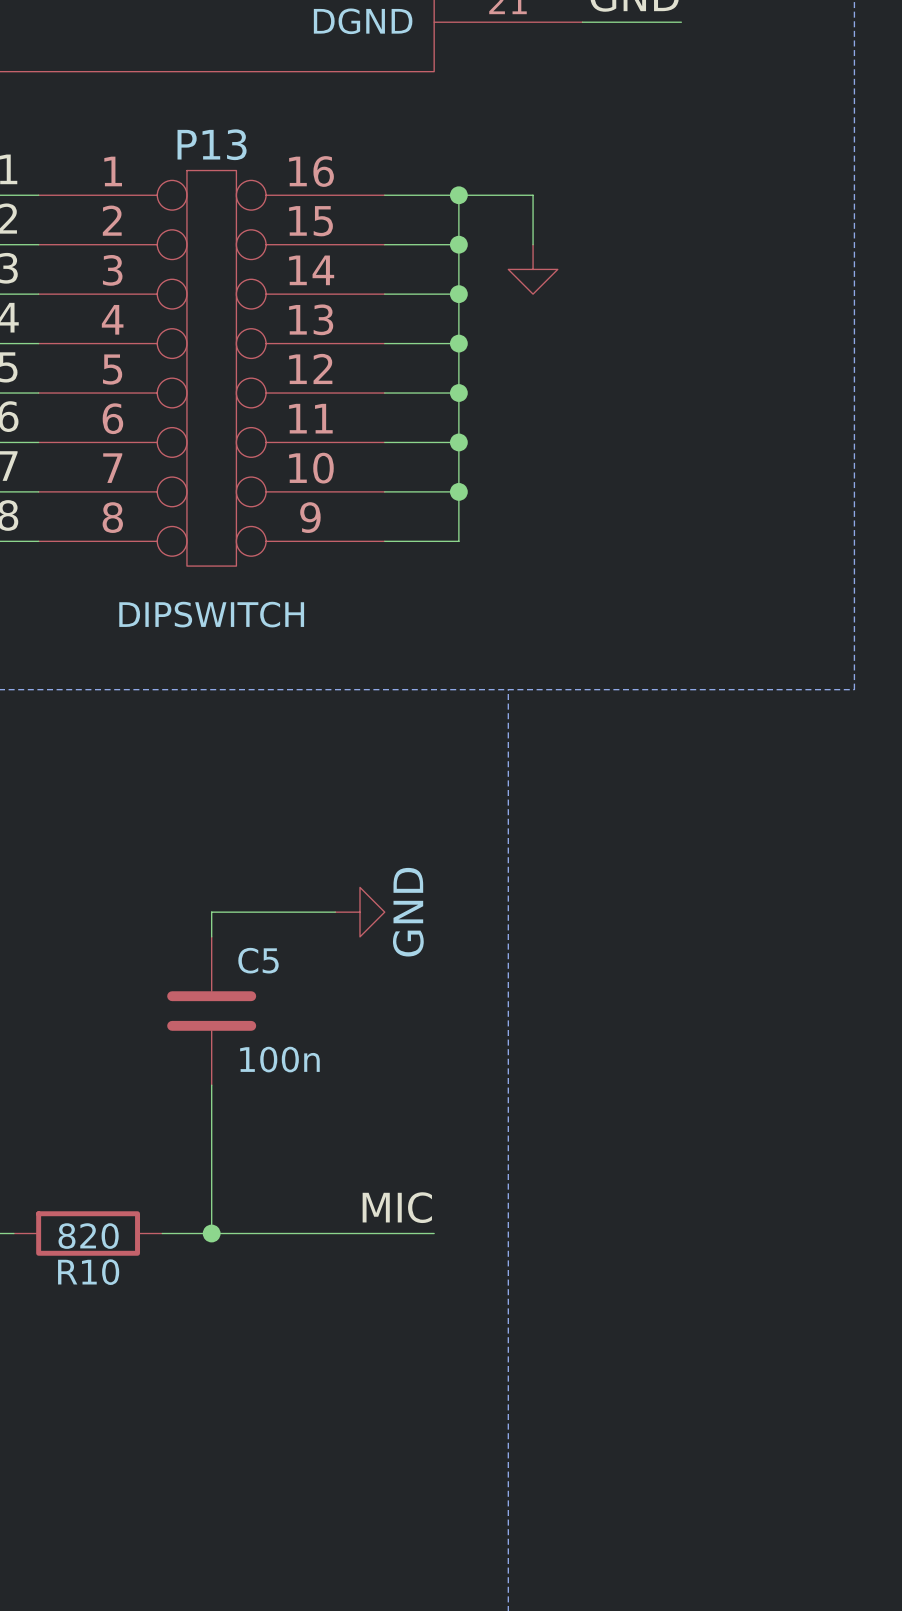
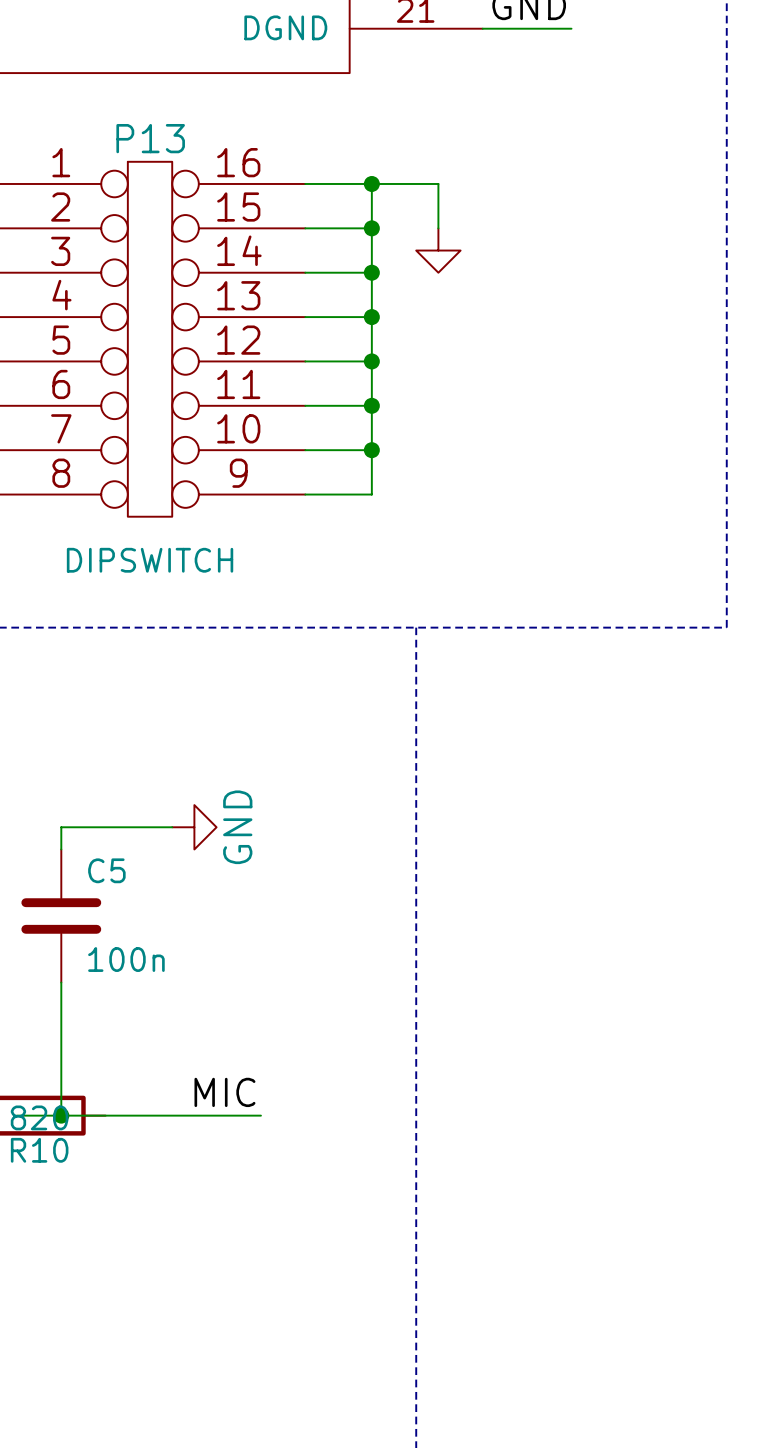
wire: (211, 912) (211, 936) -> (150, 827) (61, 827) (61, 849)
wire: (236, 912) (335, 912) -> none
power symbol position: GND (360, 912) -> GND (194, 827)
C5 position: (211, 1011) -> (61, 916)
wire: (211, 1085) (211, 1233) -> (61, 982) (61, 1115)
label position: MIC (397, 1207) -> MIC (224, 1092)
junction position: (211, 1233) -> (61, 1115)
wire: (335, 1233) (434, 1233) -> (16, 1115) (105, 1115)

